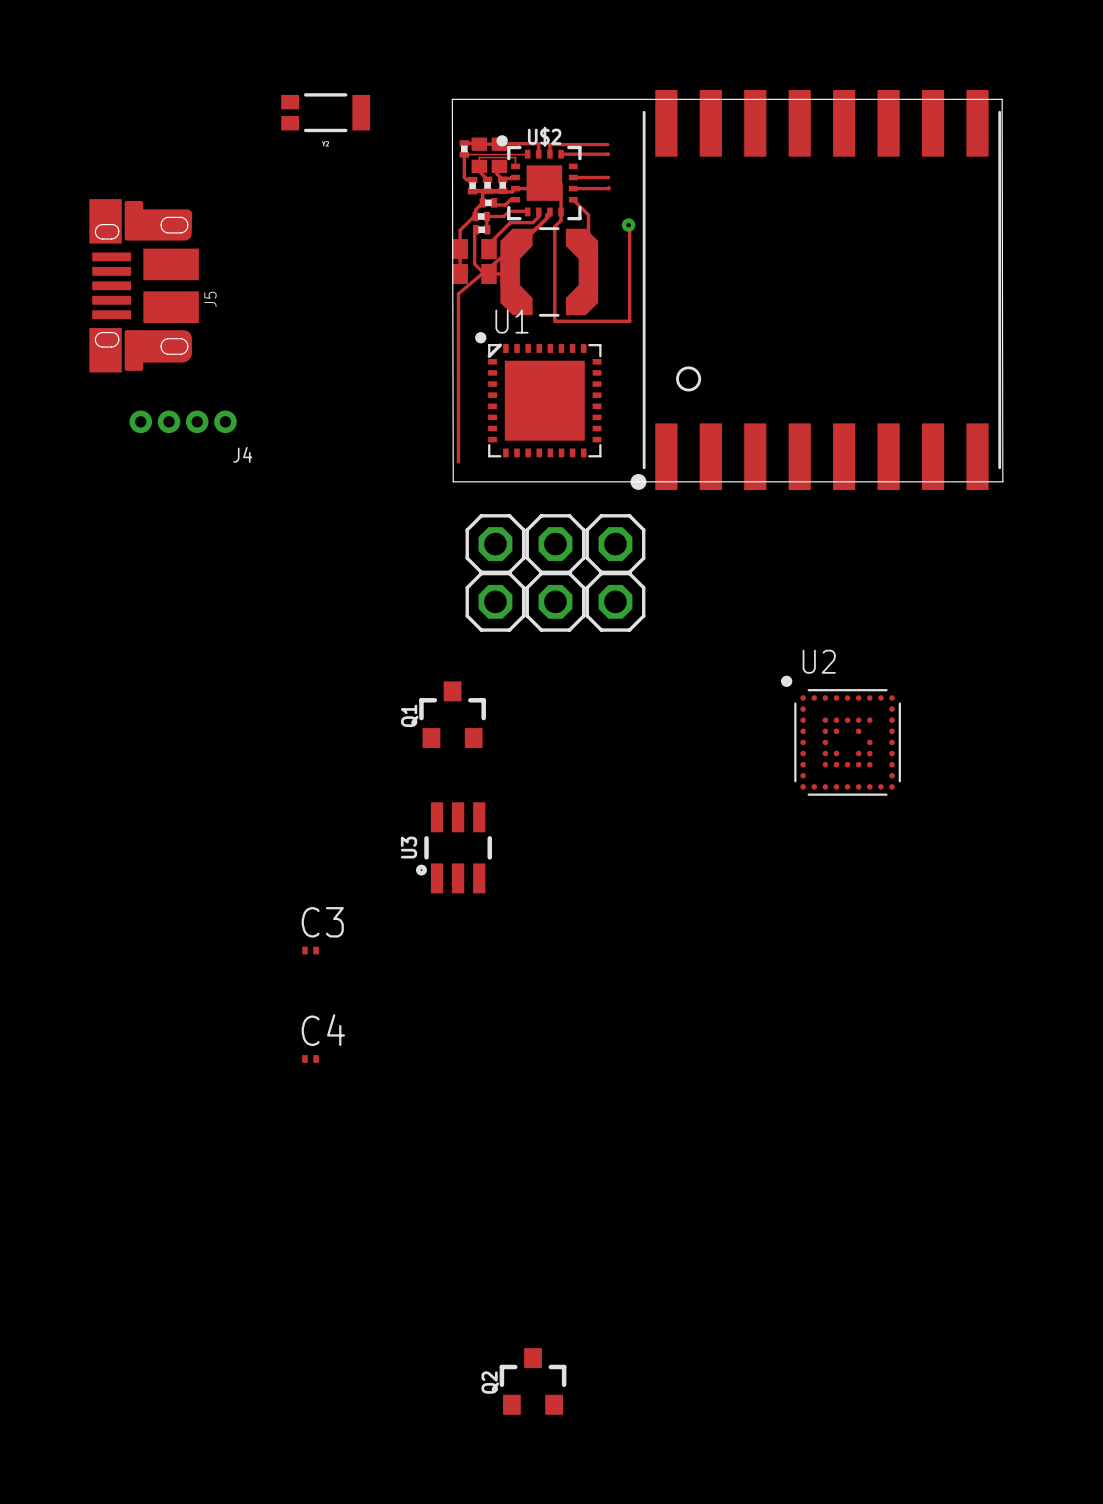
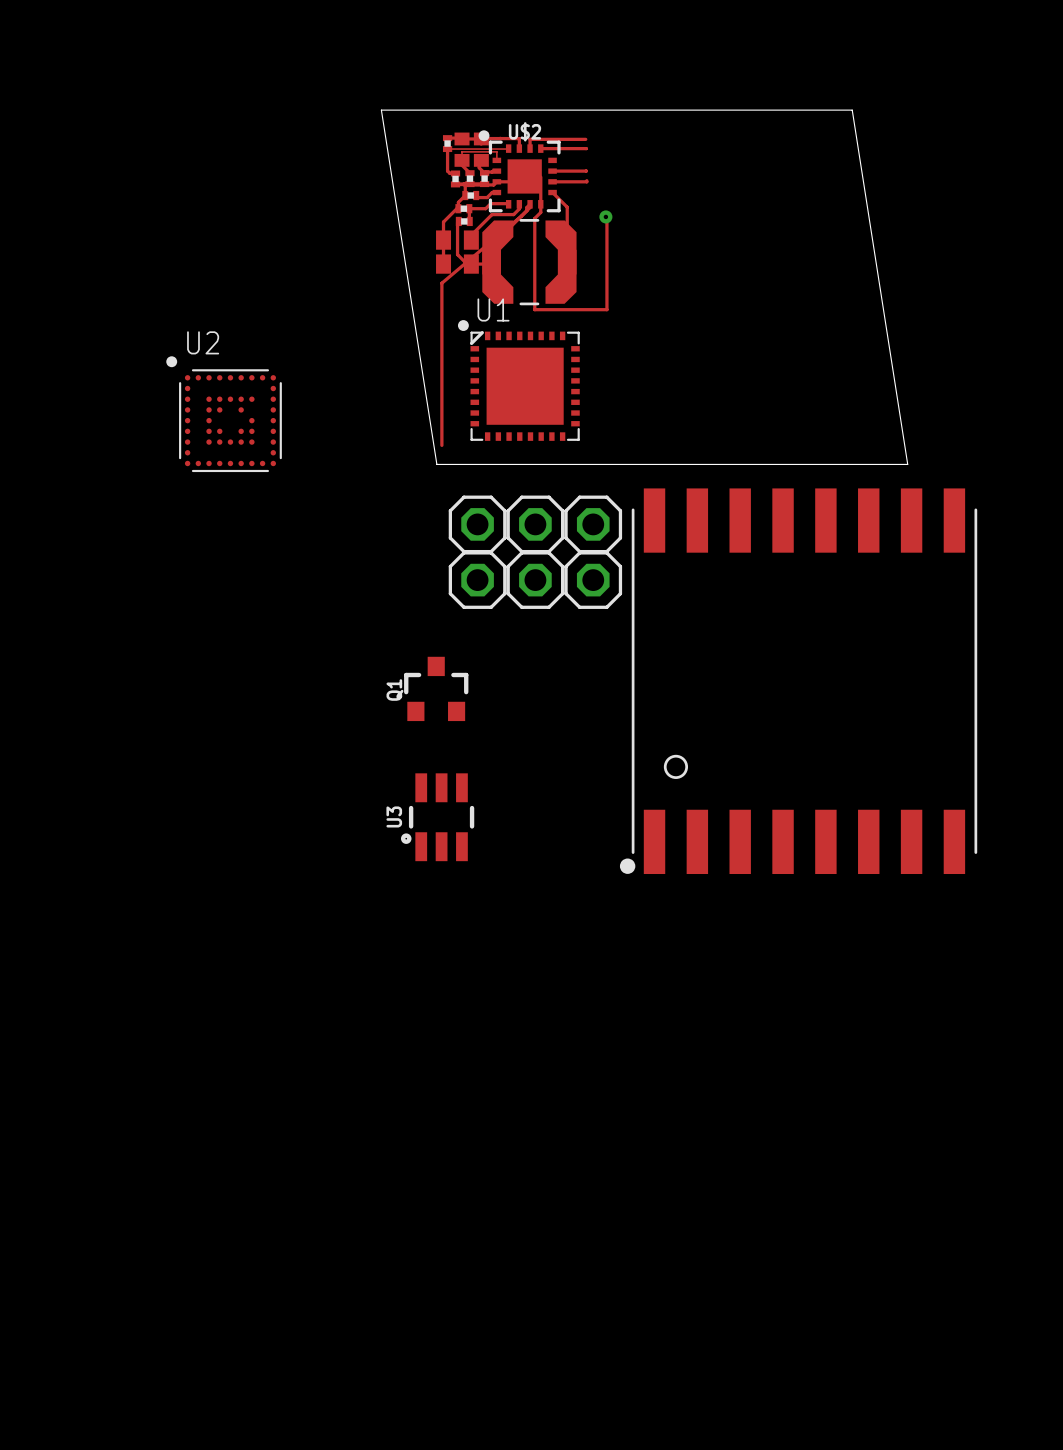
part: (325, 112) -> none
J5: (144, 285) -> none
part position: (815, 290) -> (798, 681)
J4: (183, 421) -> none
board edge: (453, 481) (452, 99) (1002, 99) (1002, 481) (941, 481) -> (436, 464) (381, 110) (852, 110) (907, 464)
U2 position: (840, 735) -> (224, 414)
C3: (310, 950) -> none
C4: (310, 1058) -> none
Q2: (533, 1381) -> none

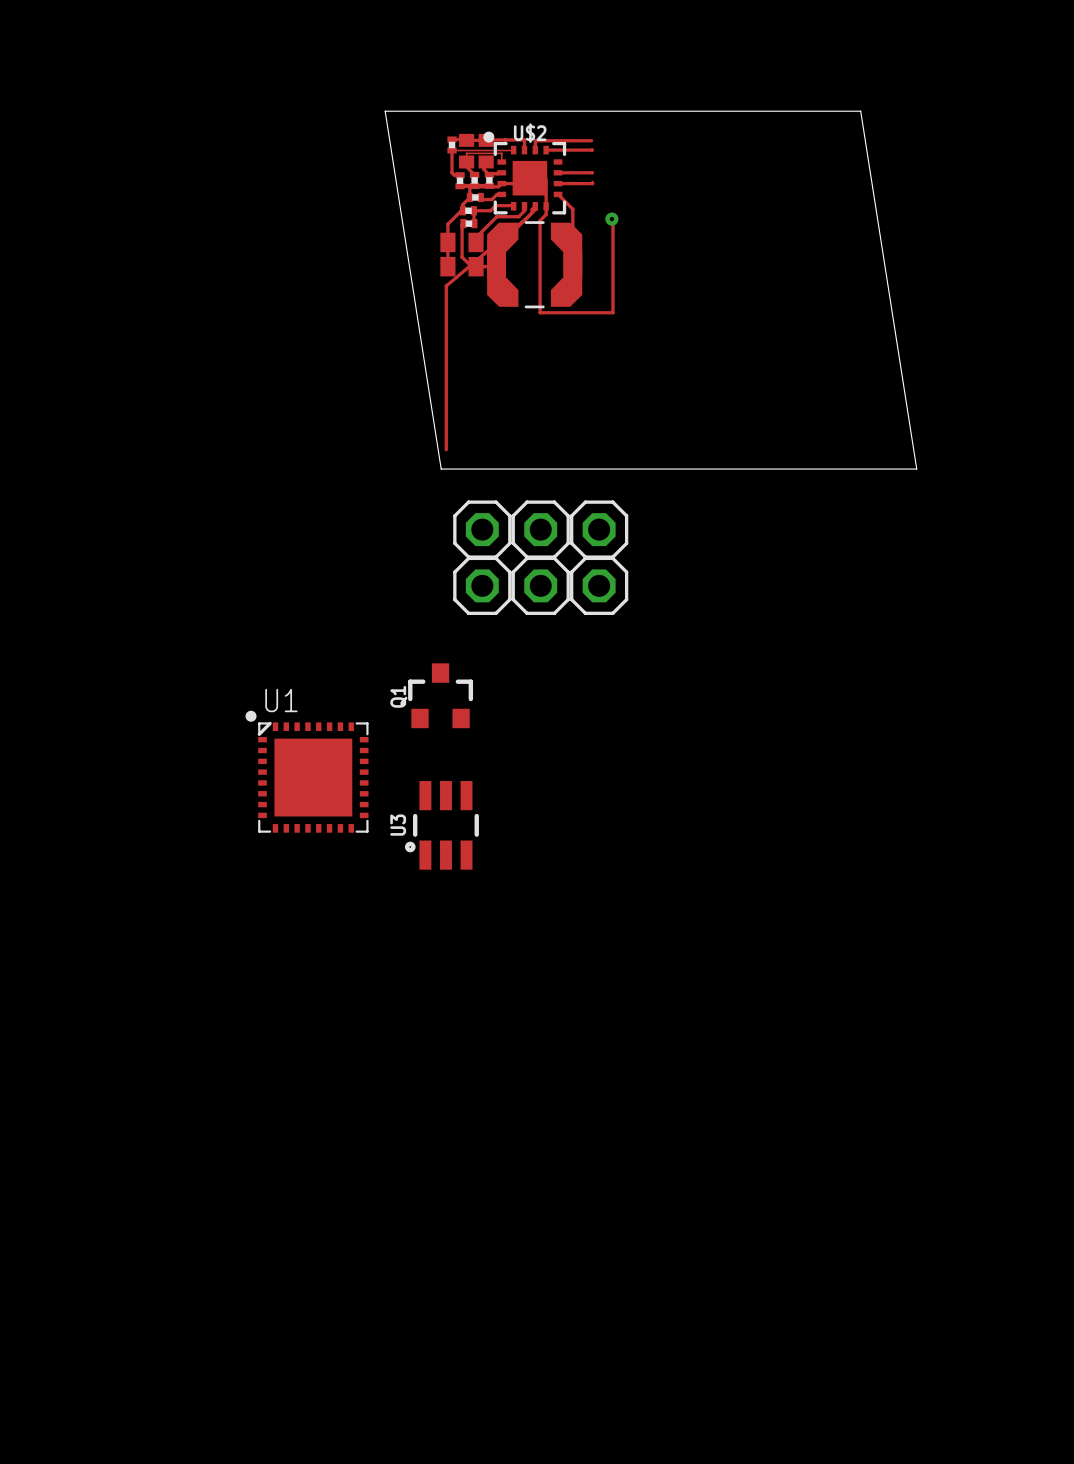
U1 position: (518, 380) -> (307, 771)
U2: (224, 414) -> none
part: (798, 681) -> none

